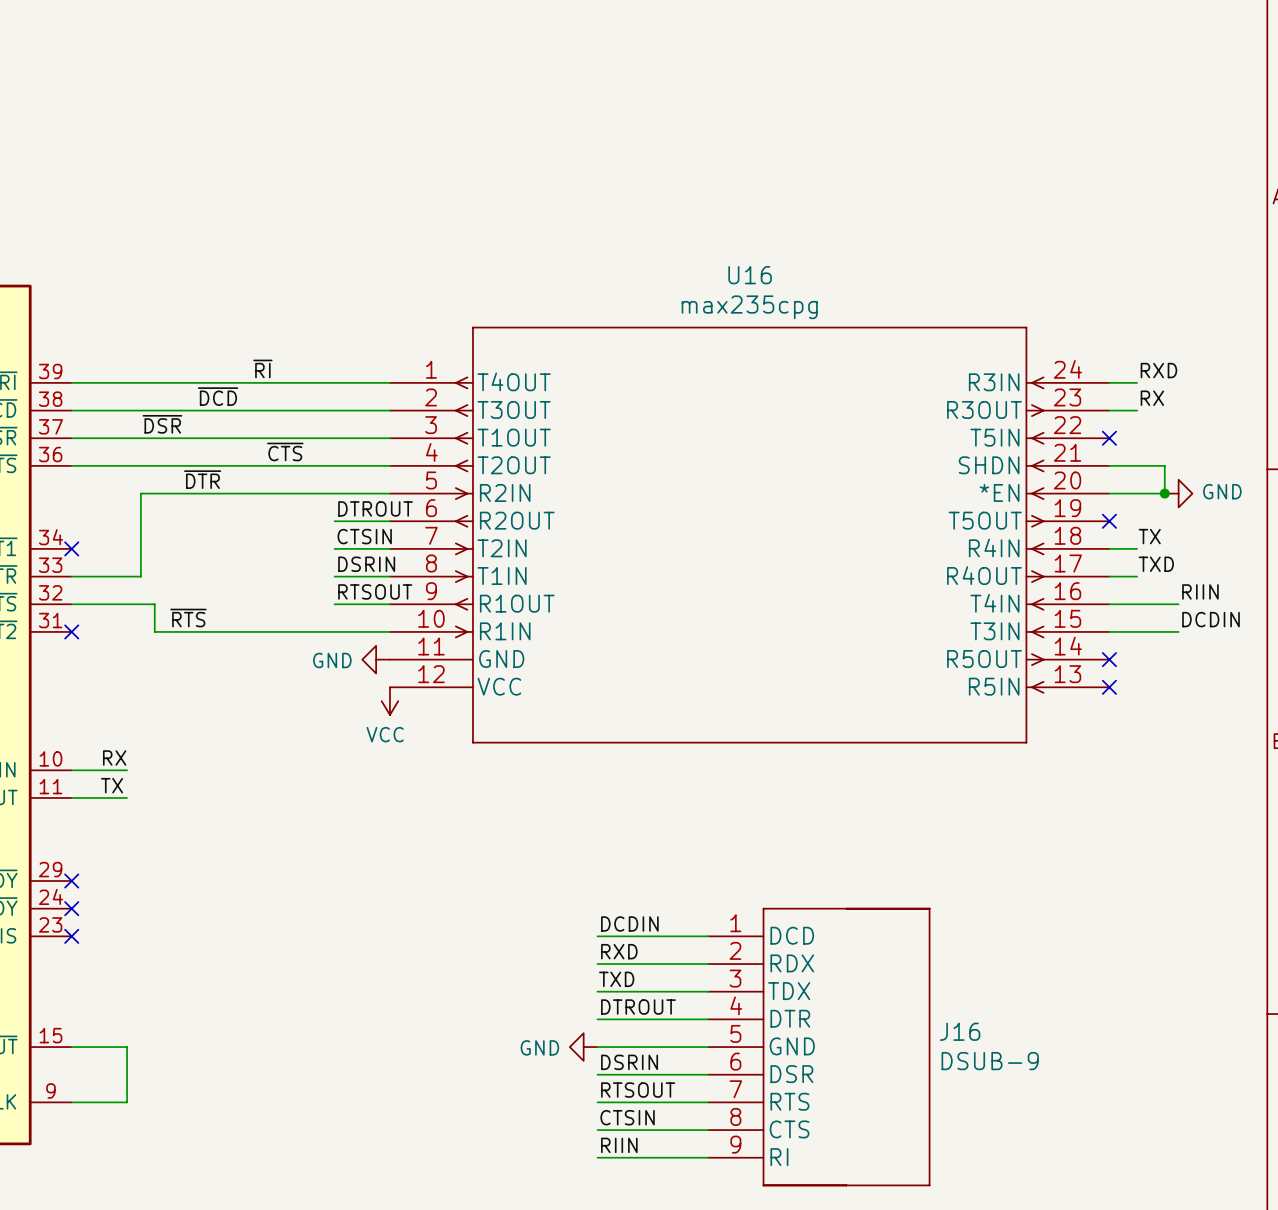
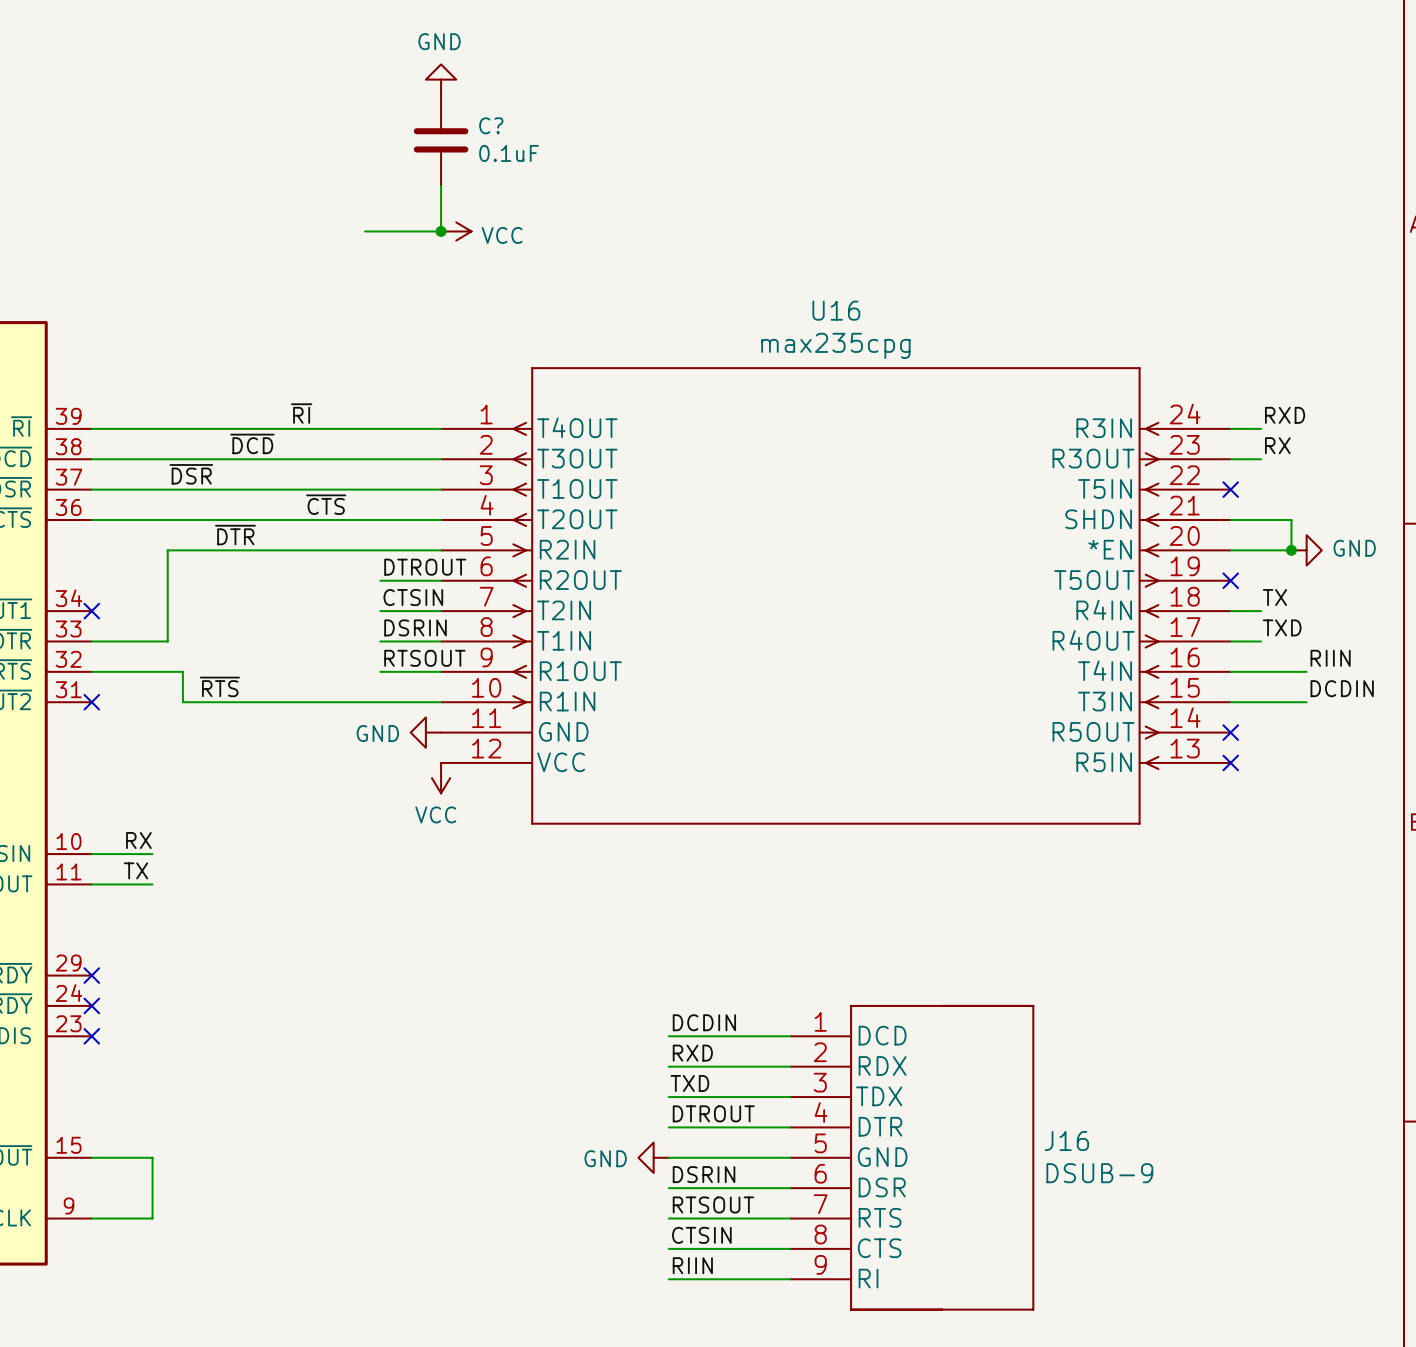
power symbol: none -> GND (441, 79)
C?: none -> 0.1uF (441, 140)
wire: none -> (441, 185) (441, 231) (365, 231)
junction: none -> (441, 231)
power symbol: none -> VCC (456, 231)

